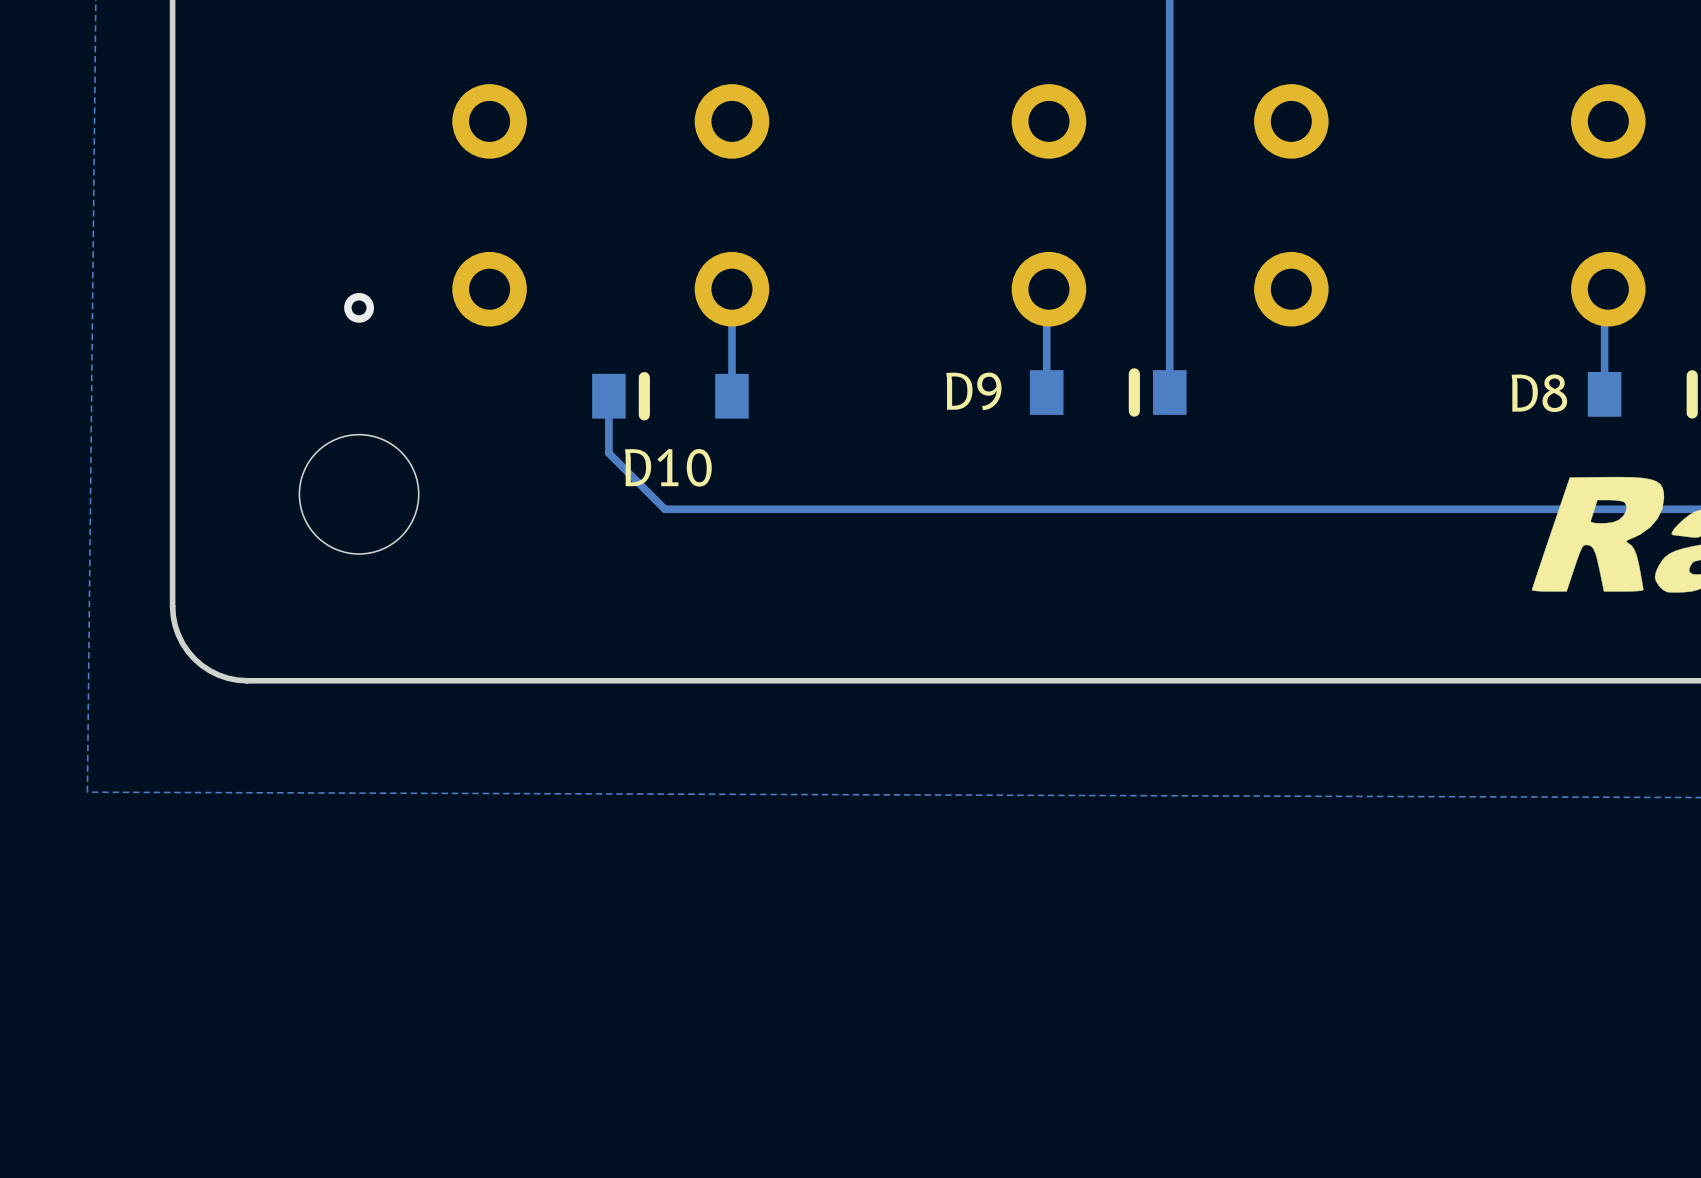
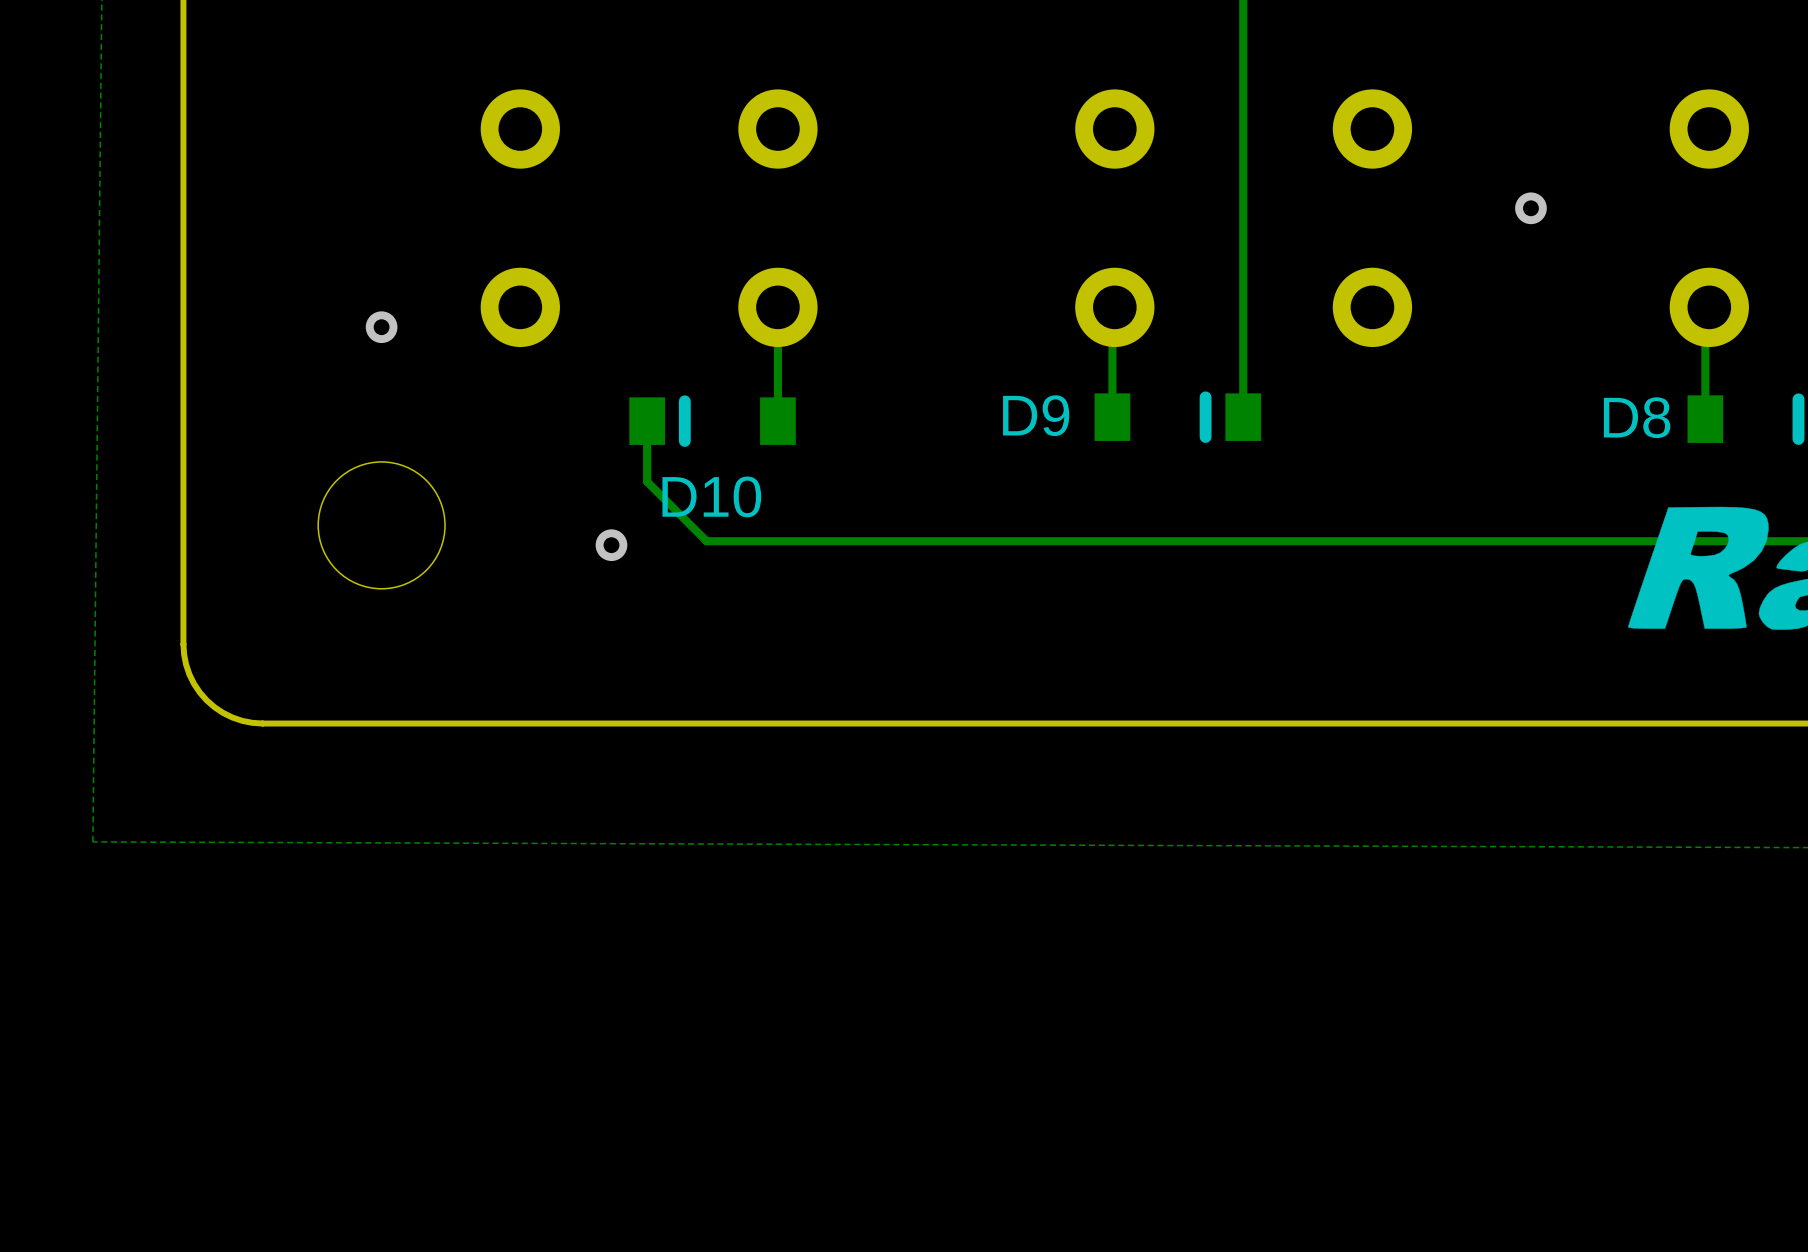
via: none -> (1530, 208)
via: none -> (611, 545)

